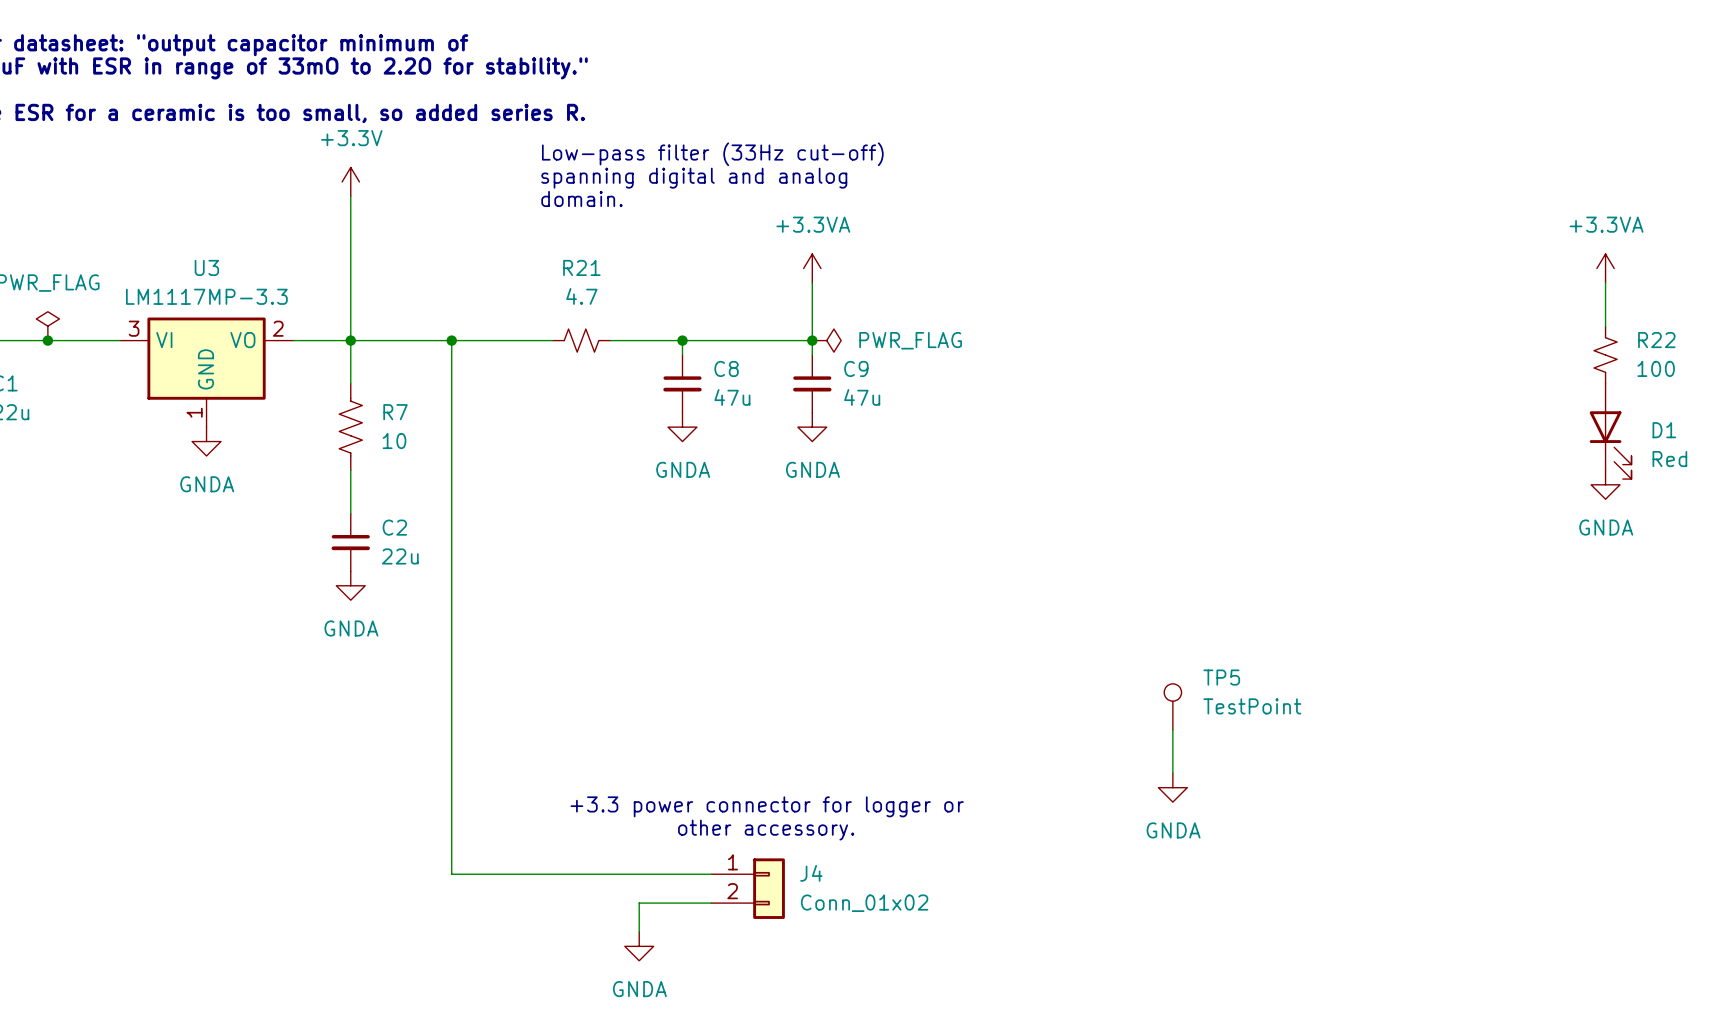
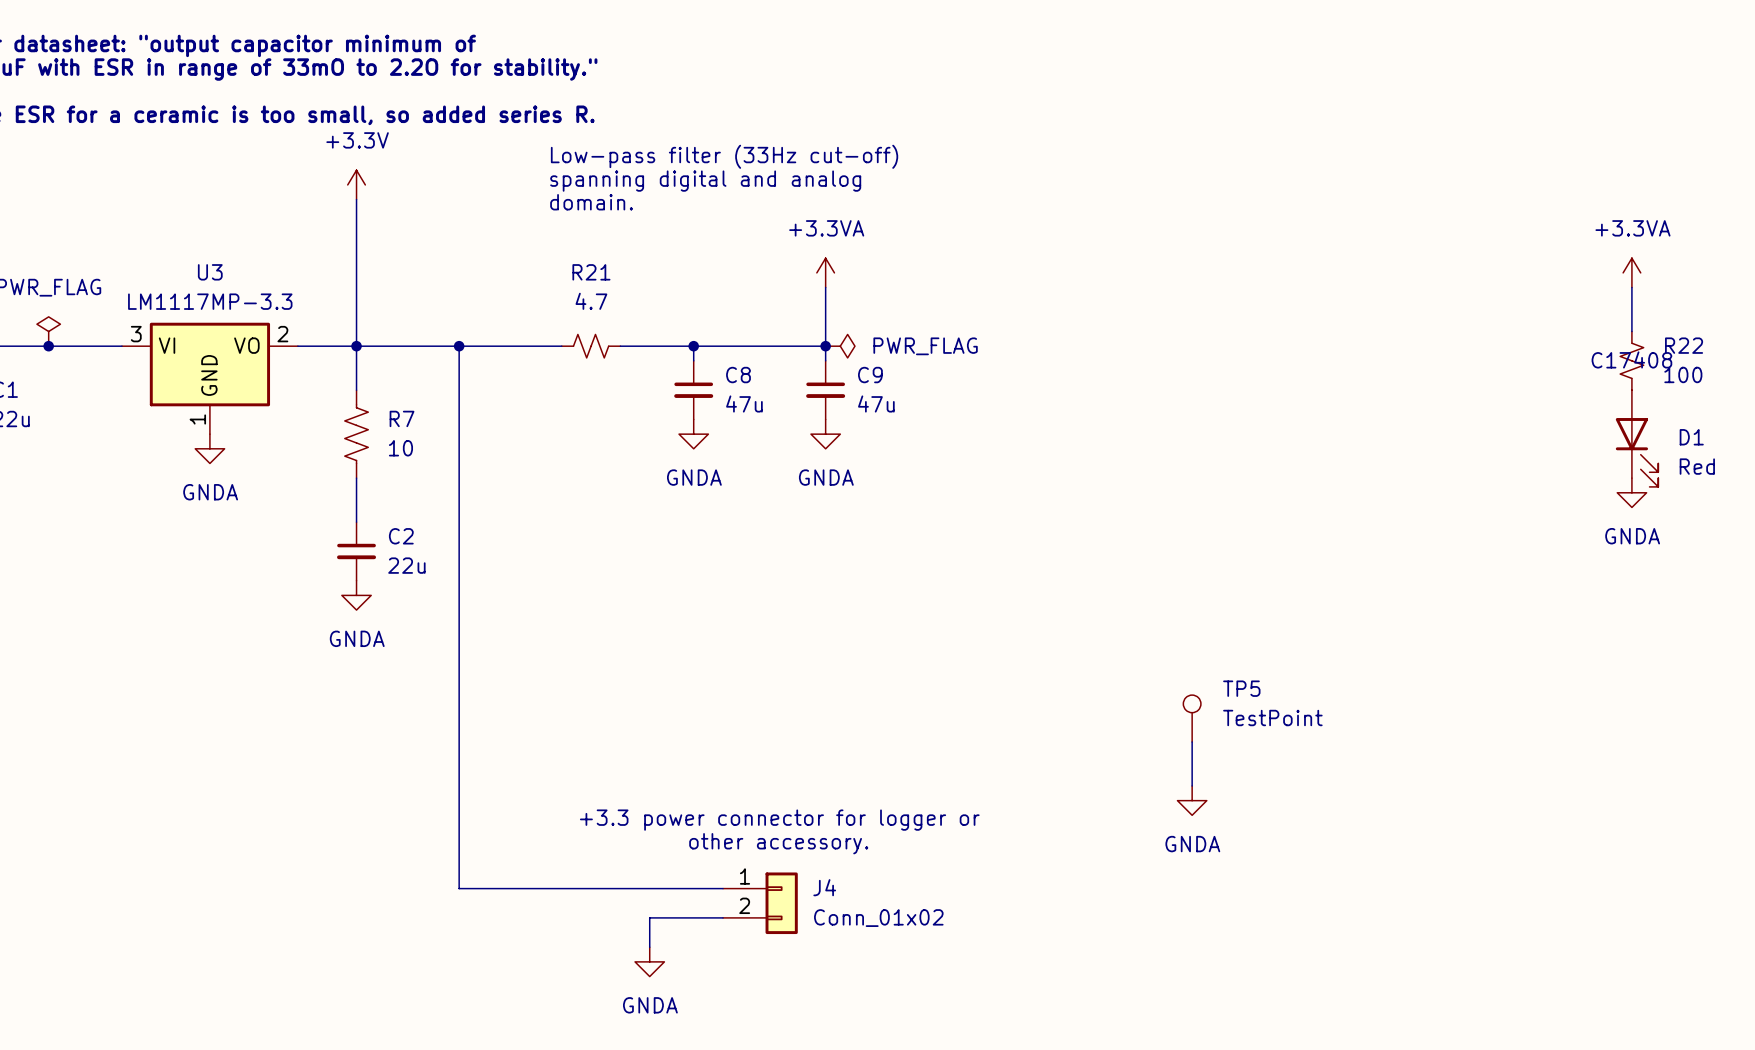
R22 text: none -> C17408 (1631, 359)

